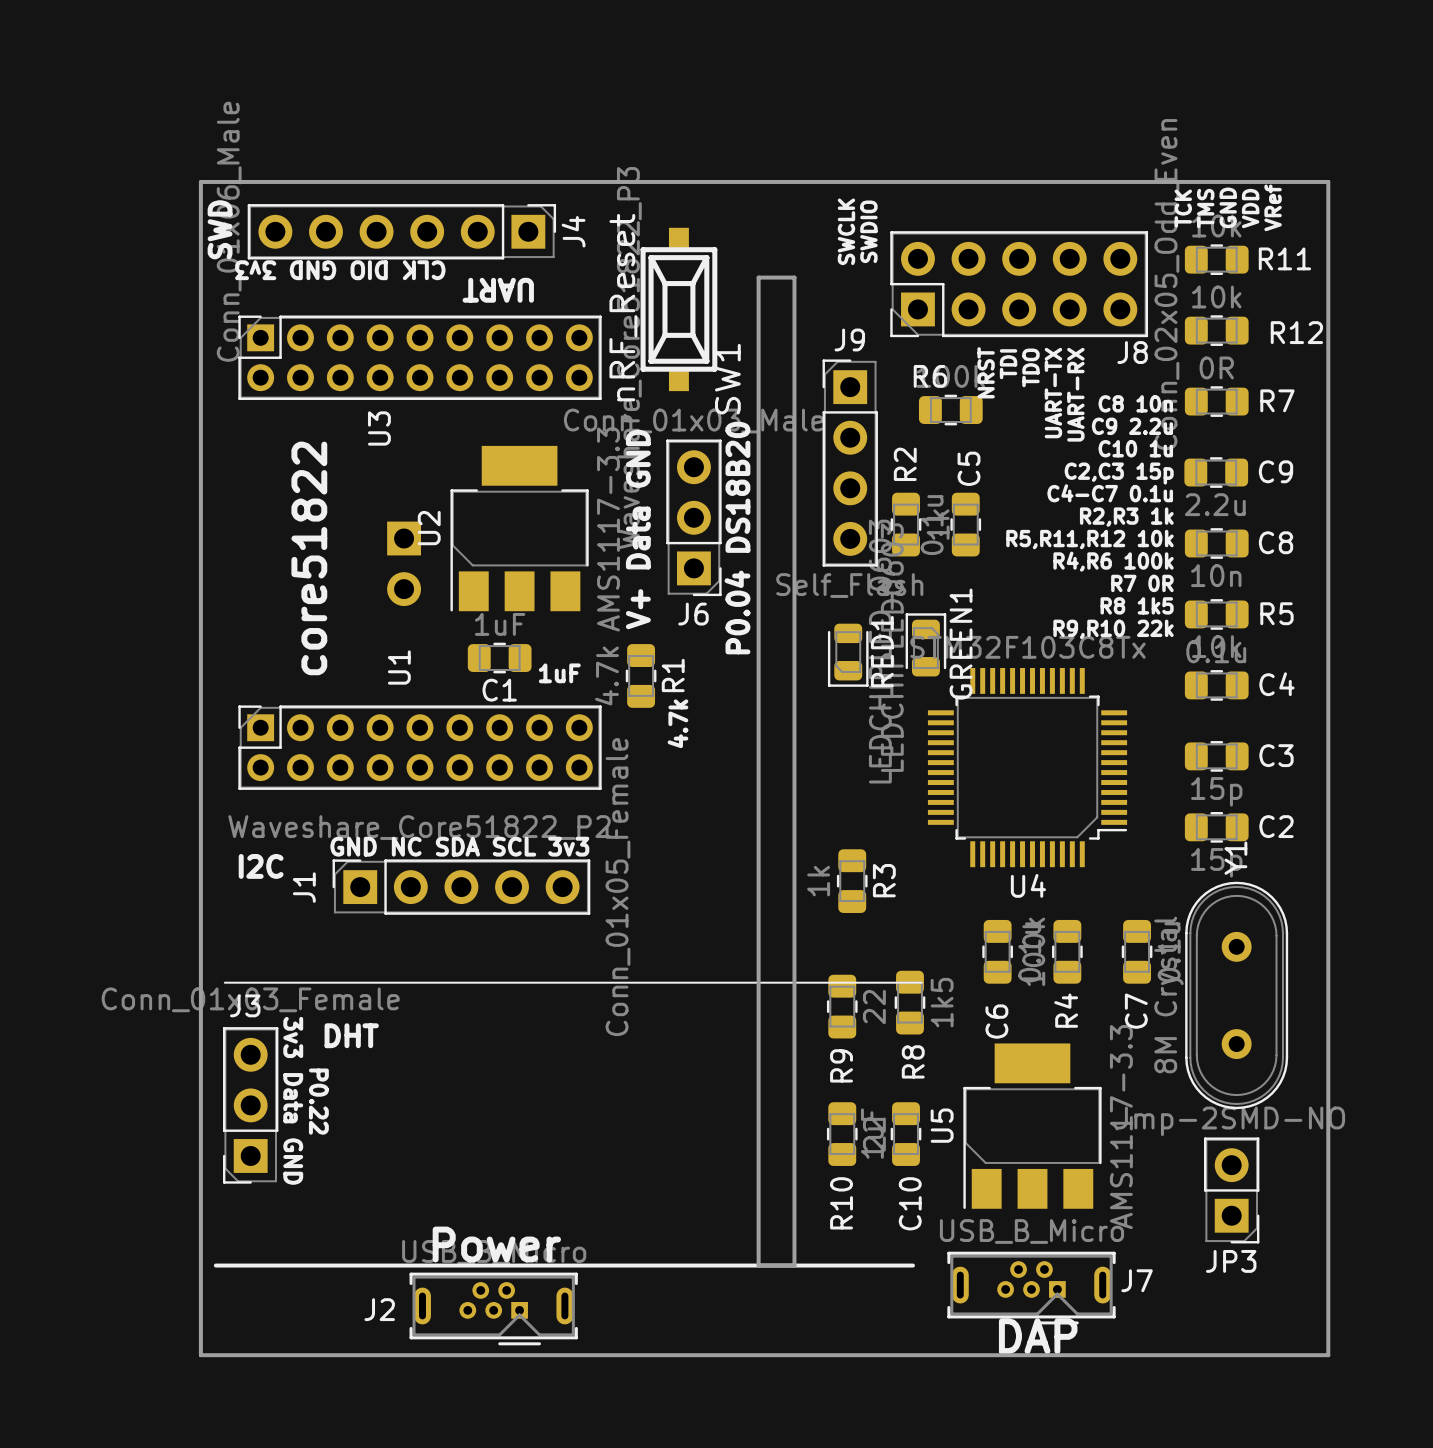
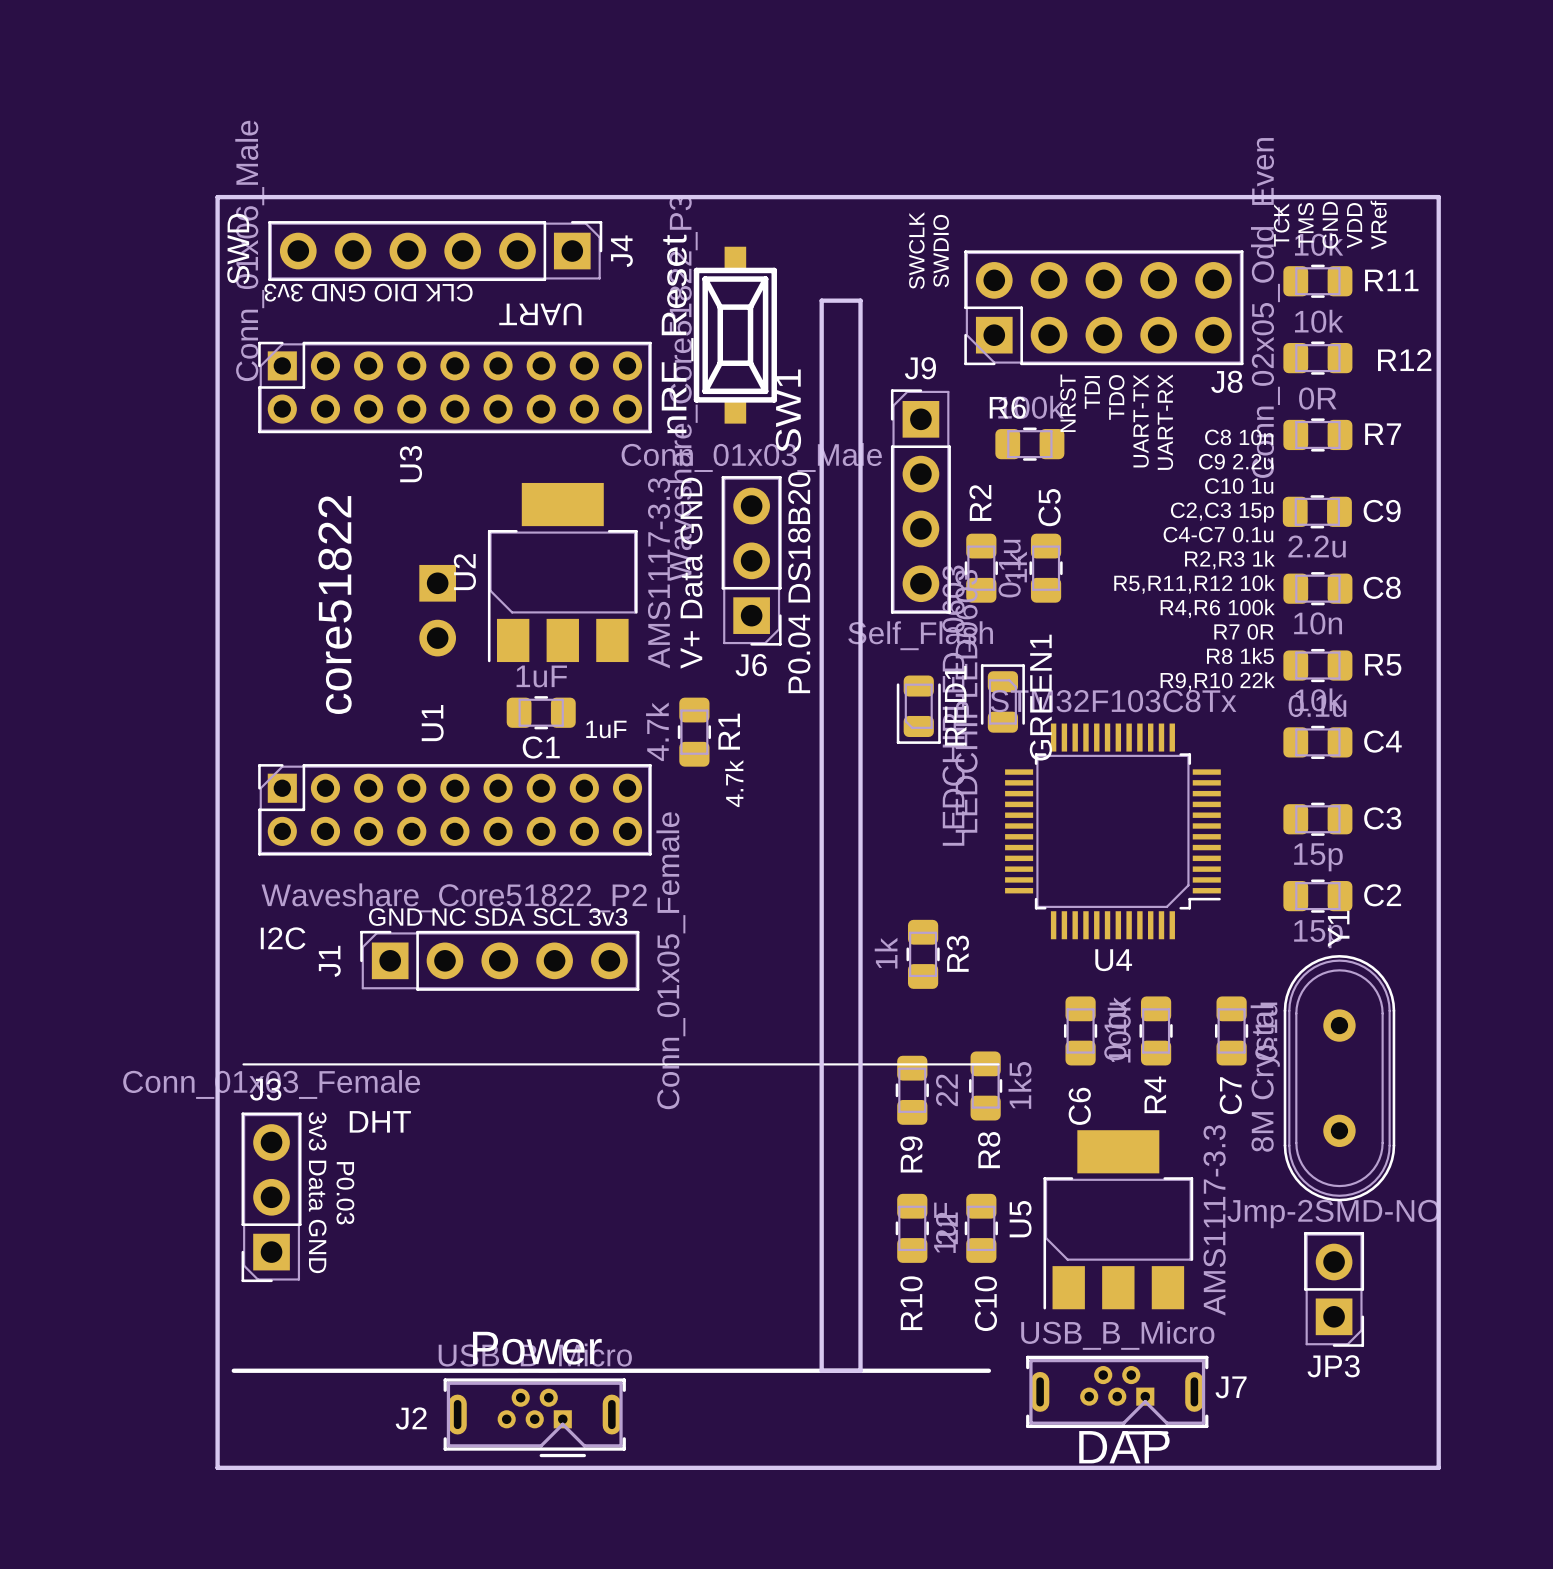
text: P0.22 (318, 1101) -> P0.03 (345, 1193)

